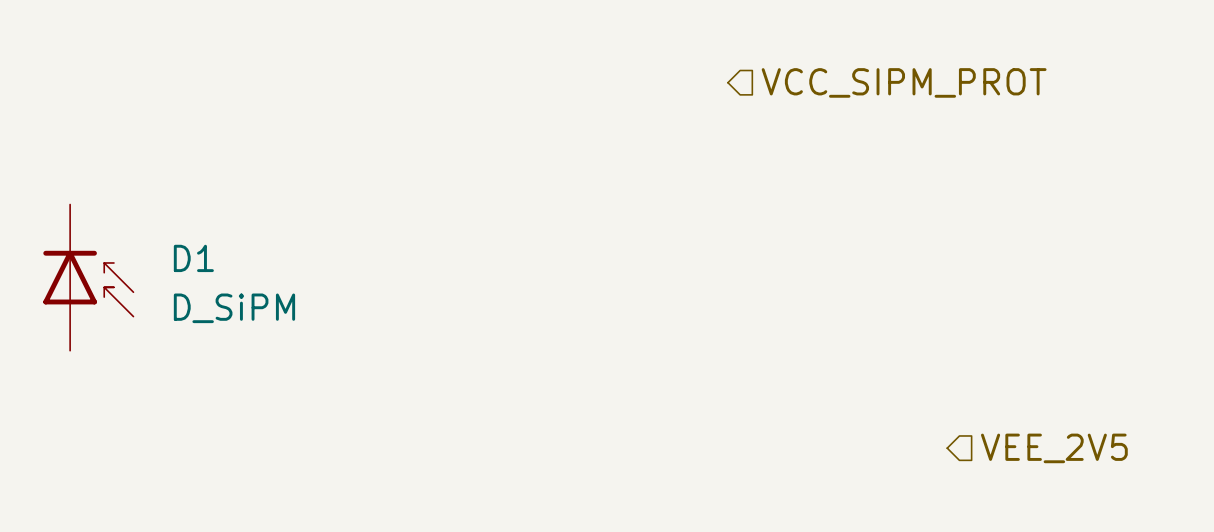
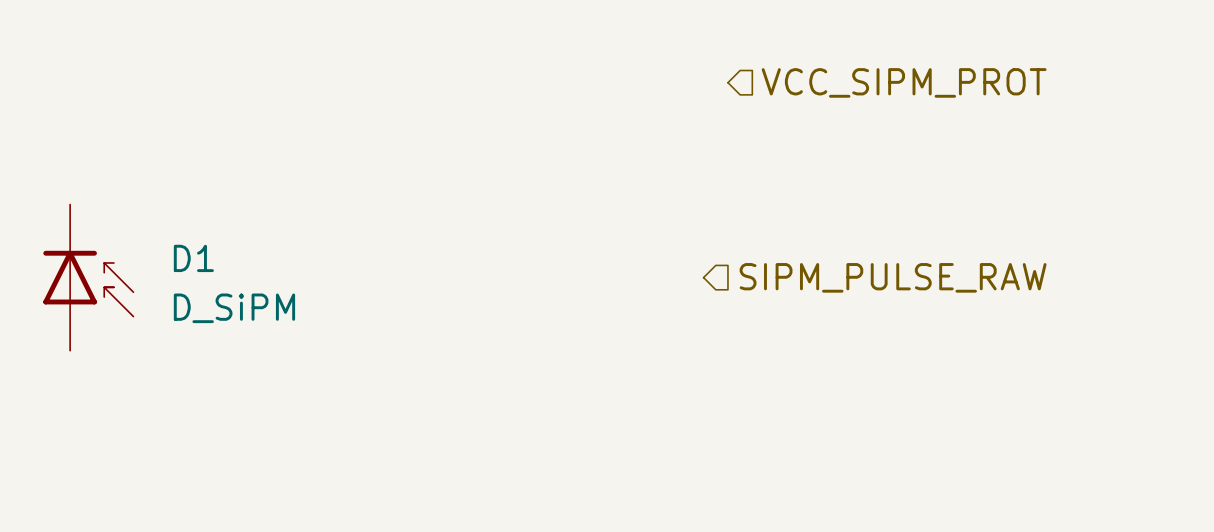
hierarchical label: none -> SIPM_PULSE_RAW (893, 277)
hierarchical label: VEE_2V5 (1054, 448) -> none

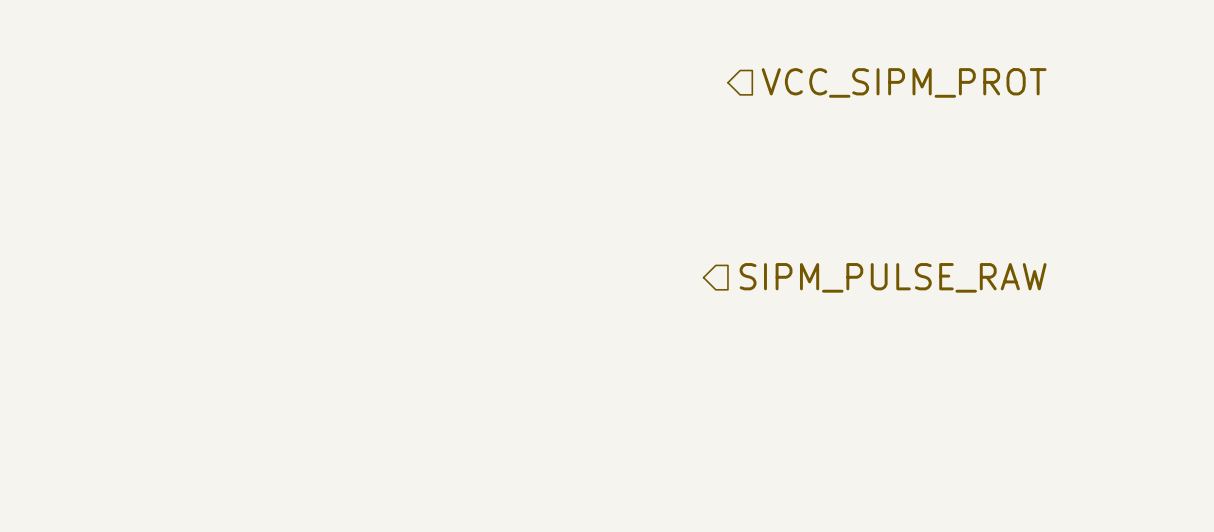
D1: D_SiPM (88, 277) -> none

